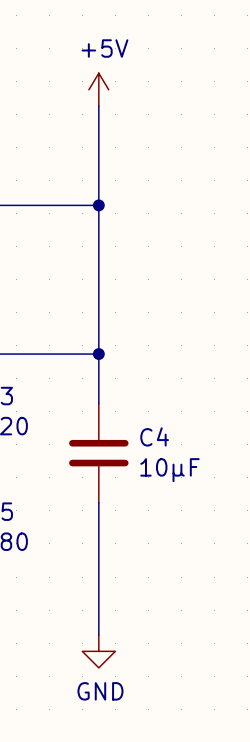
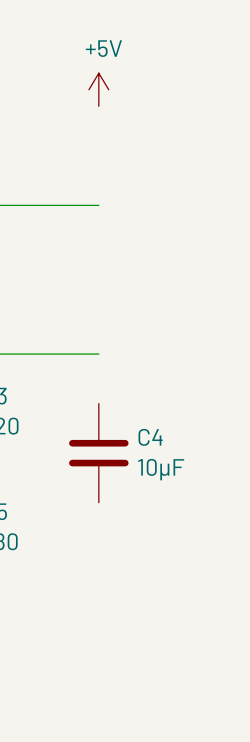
wire: (98, 106) (98, 403) -> none
junction: (98, 205) -> none
junction: (98, 354) -> none
wire: (98, 502) (98, 634) -> none
power symbol: GND (98, 651) -> none

